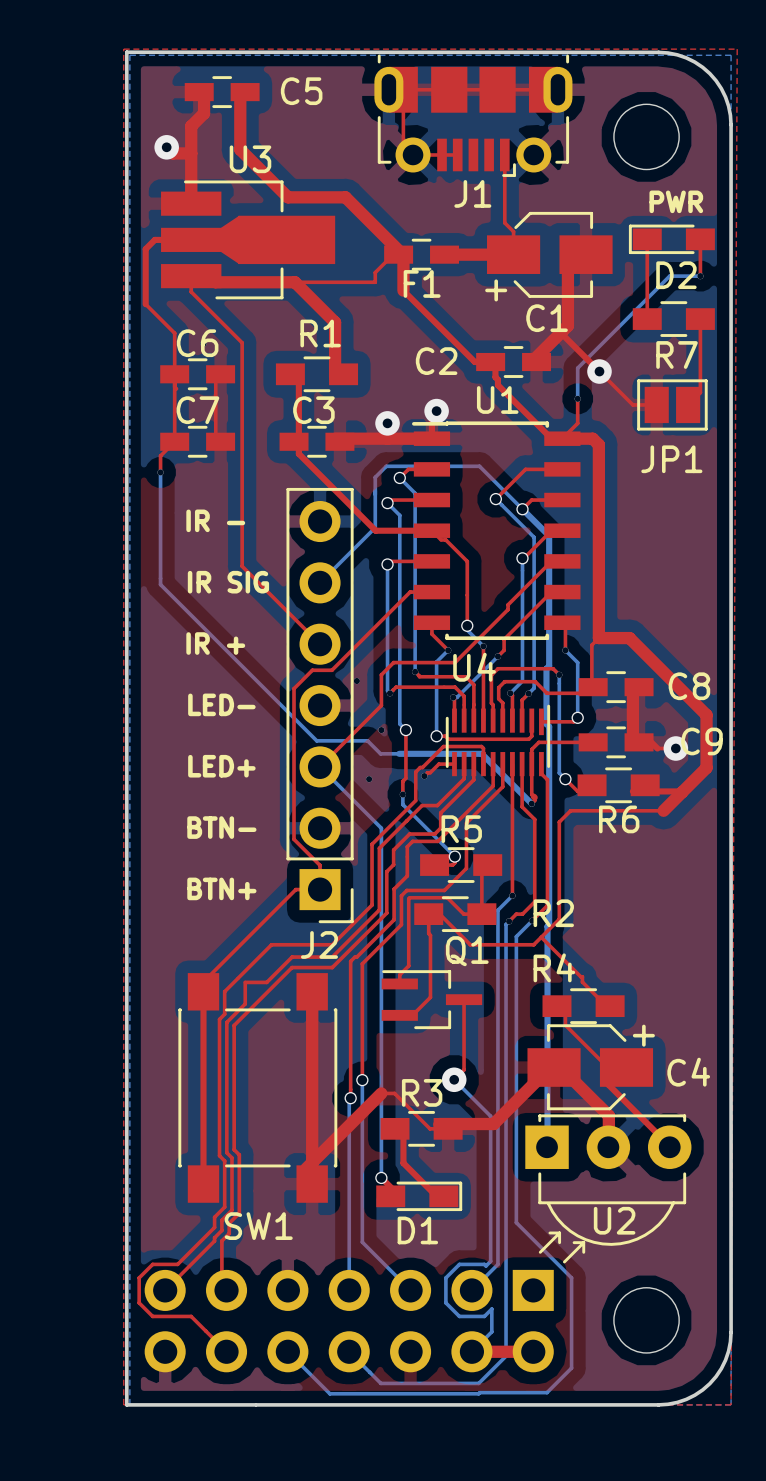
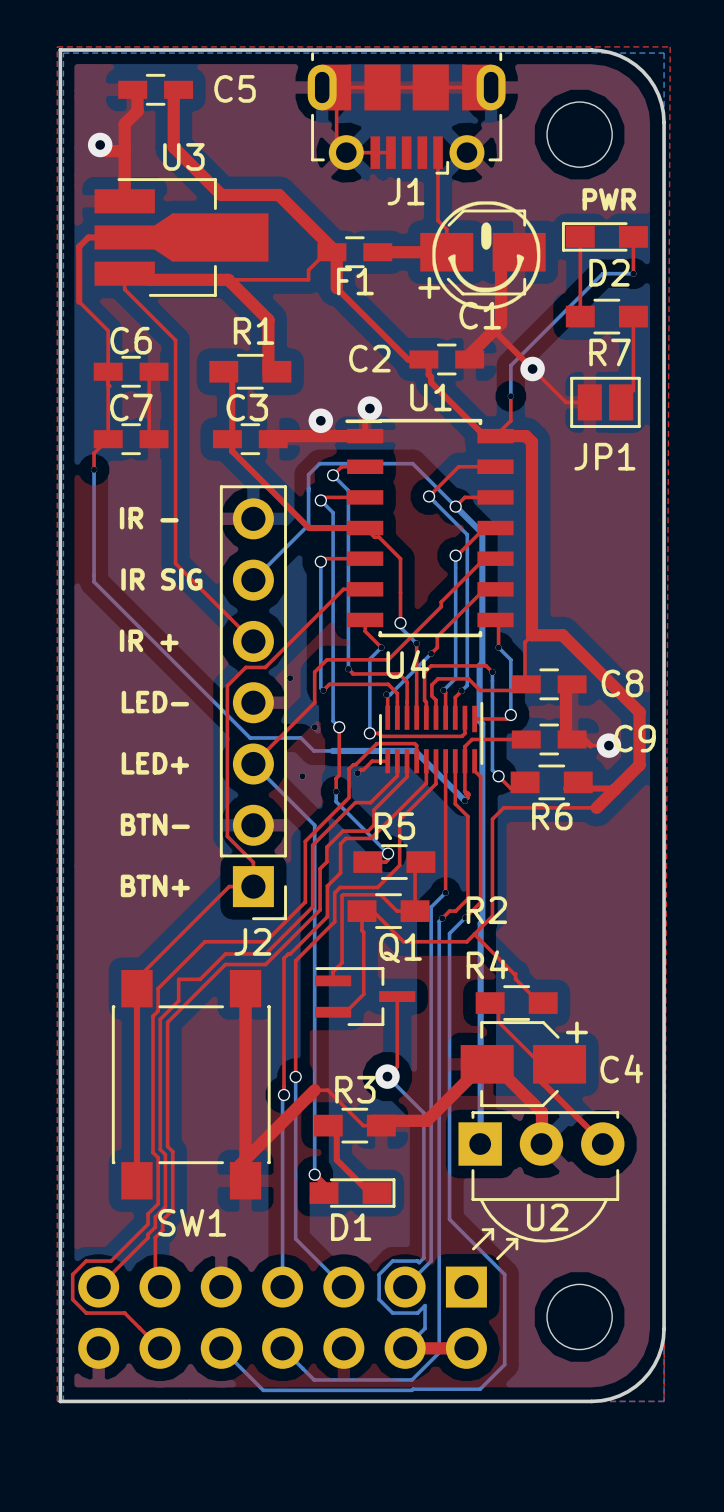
drawing: none -> [432, 201, 541, 310]

